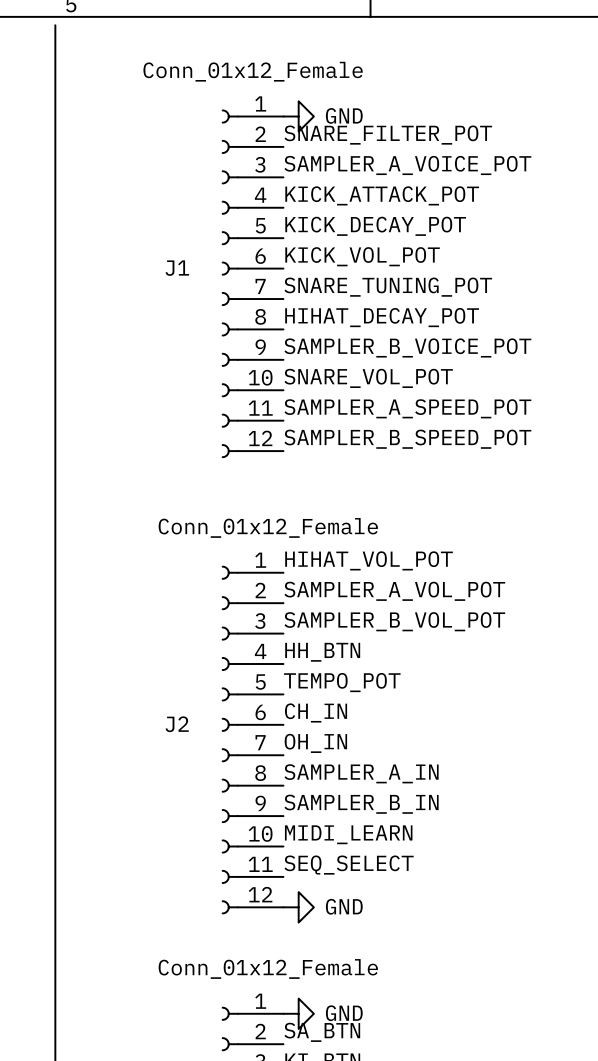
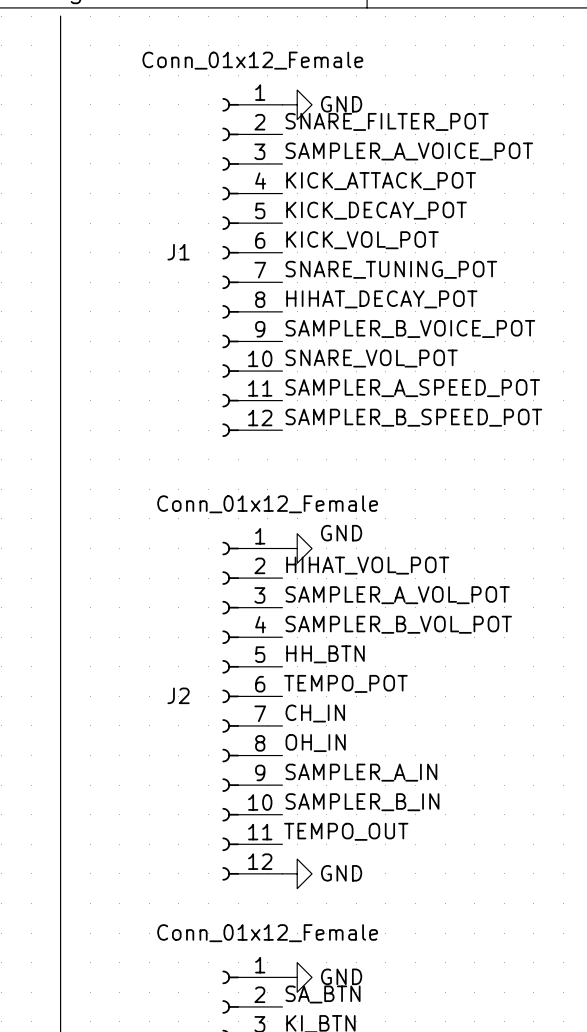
label: HIHAT_VOL_POT (369, 560) -> none
power symbol: none -> GND (297, 548)
label: SAMPLER_A_VOL_POT (394, 591) -> HIHAT_VOL_POT (367, 565)
label: SAMPLER_B_VOL_POT (394, 621) -> SAMPLER_A_VOL_POT (397, 595)
label: HH_BTN (322, 652) -> SAMPLER_B_VOL_POT (398, 624)
label: TEMPO_POT (342, 682) -> HH_BTN (325, 654)
label: CH_IN (316, 712) -> TEMPO_POT (345, 683)
label: OH_IN (315, 743) -> CH_IN (315, 713)
label: SAMPLER_A_IN (361, 773) -> OH_IN (315, 743)
label: SAMPLER_B_IN (361, 804) -> SAMPLER_A_IN (361, 772)
label: MIDI_LEARN (348, 834) -> SAMPLER_B_IN (362, 802)
label: SEQ_SELECT (349, 865) -> TEMPO_OUT (346, 831)

